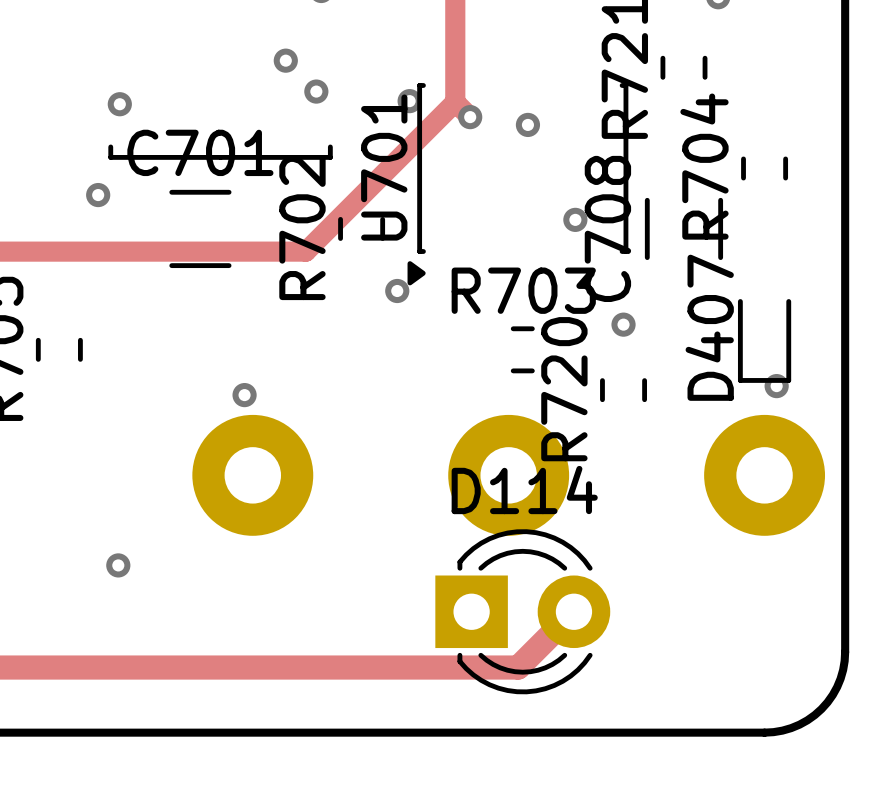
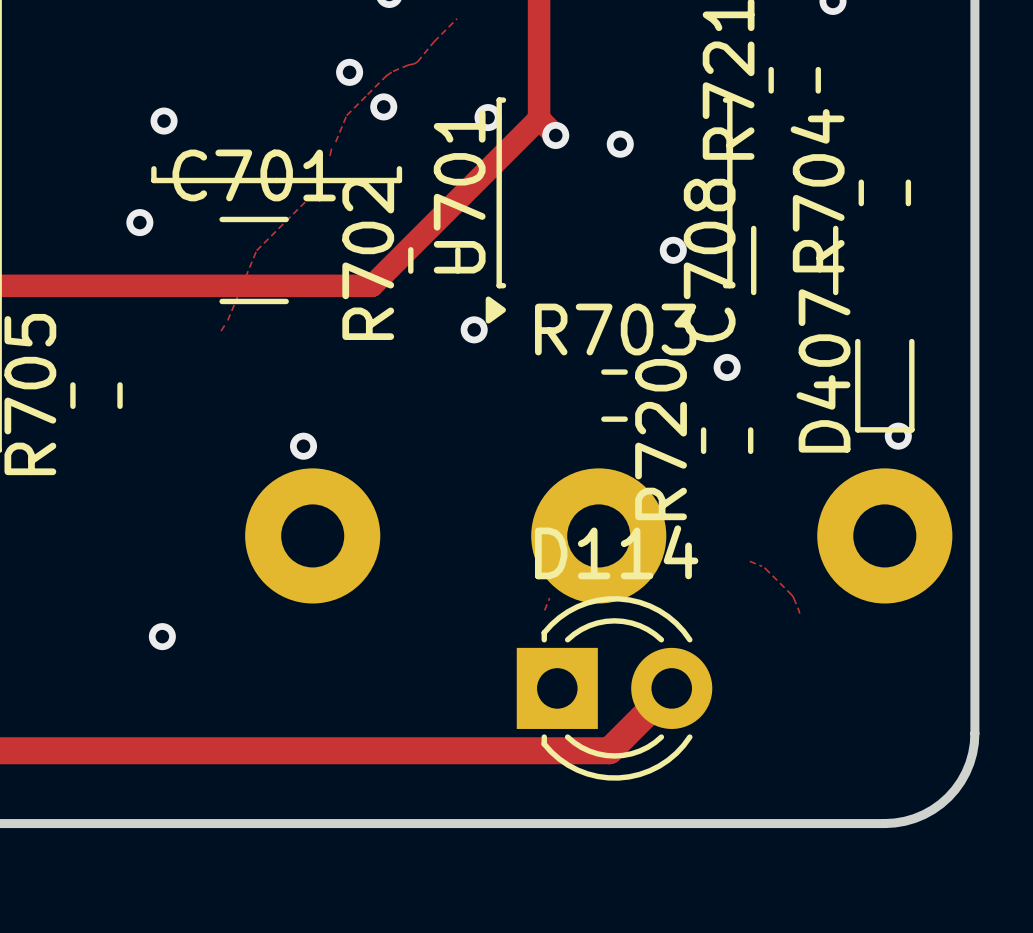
zone outline: none -> (457, 18) (417, 61) (386, 75) (346, 115) (335, 142)
zone outline: none -> (331, 146) (329, 156)
zone outline: none -> (309, 197) (256, 250) (245, 277)
zone outline: none -> (239, 292) (227, 320)
zone outline: none -> (226, 322) (221, 330)
zone outline: none -> (749, 561) (762, 566)
zone outline: none -> (764, 567) (792, 595)
zone outline: none -> (792, 596) (793, 596)
zone outline: none -> (549, 598) (544, 610)
zone outline: none -> (793, 598) (798, 610)

